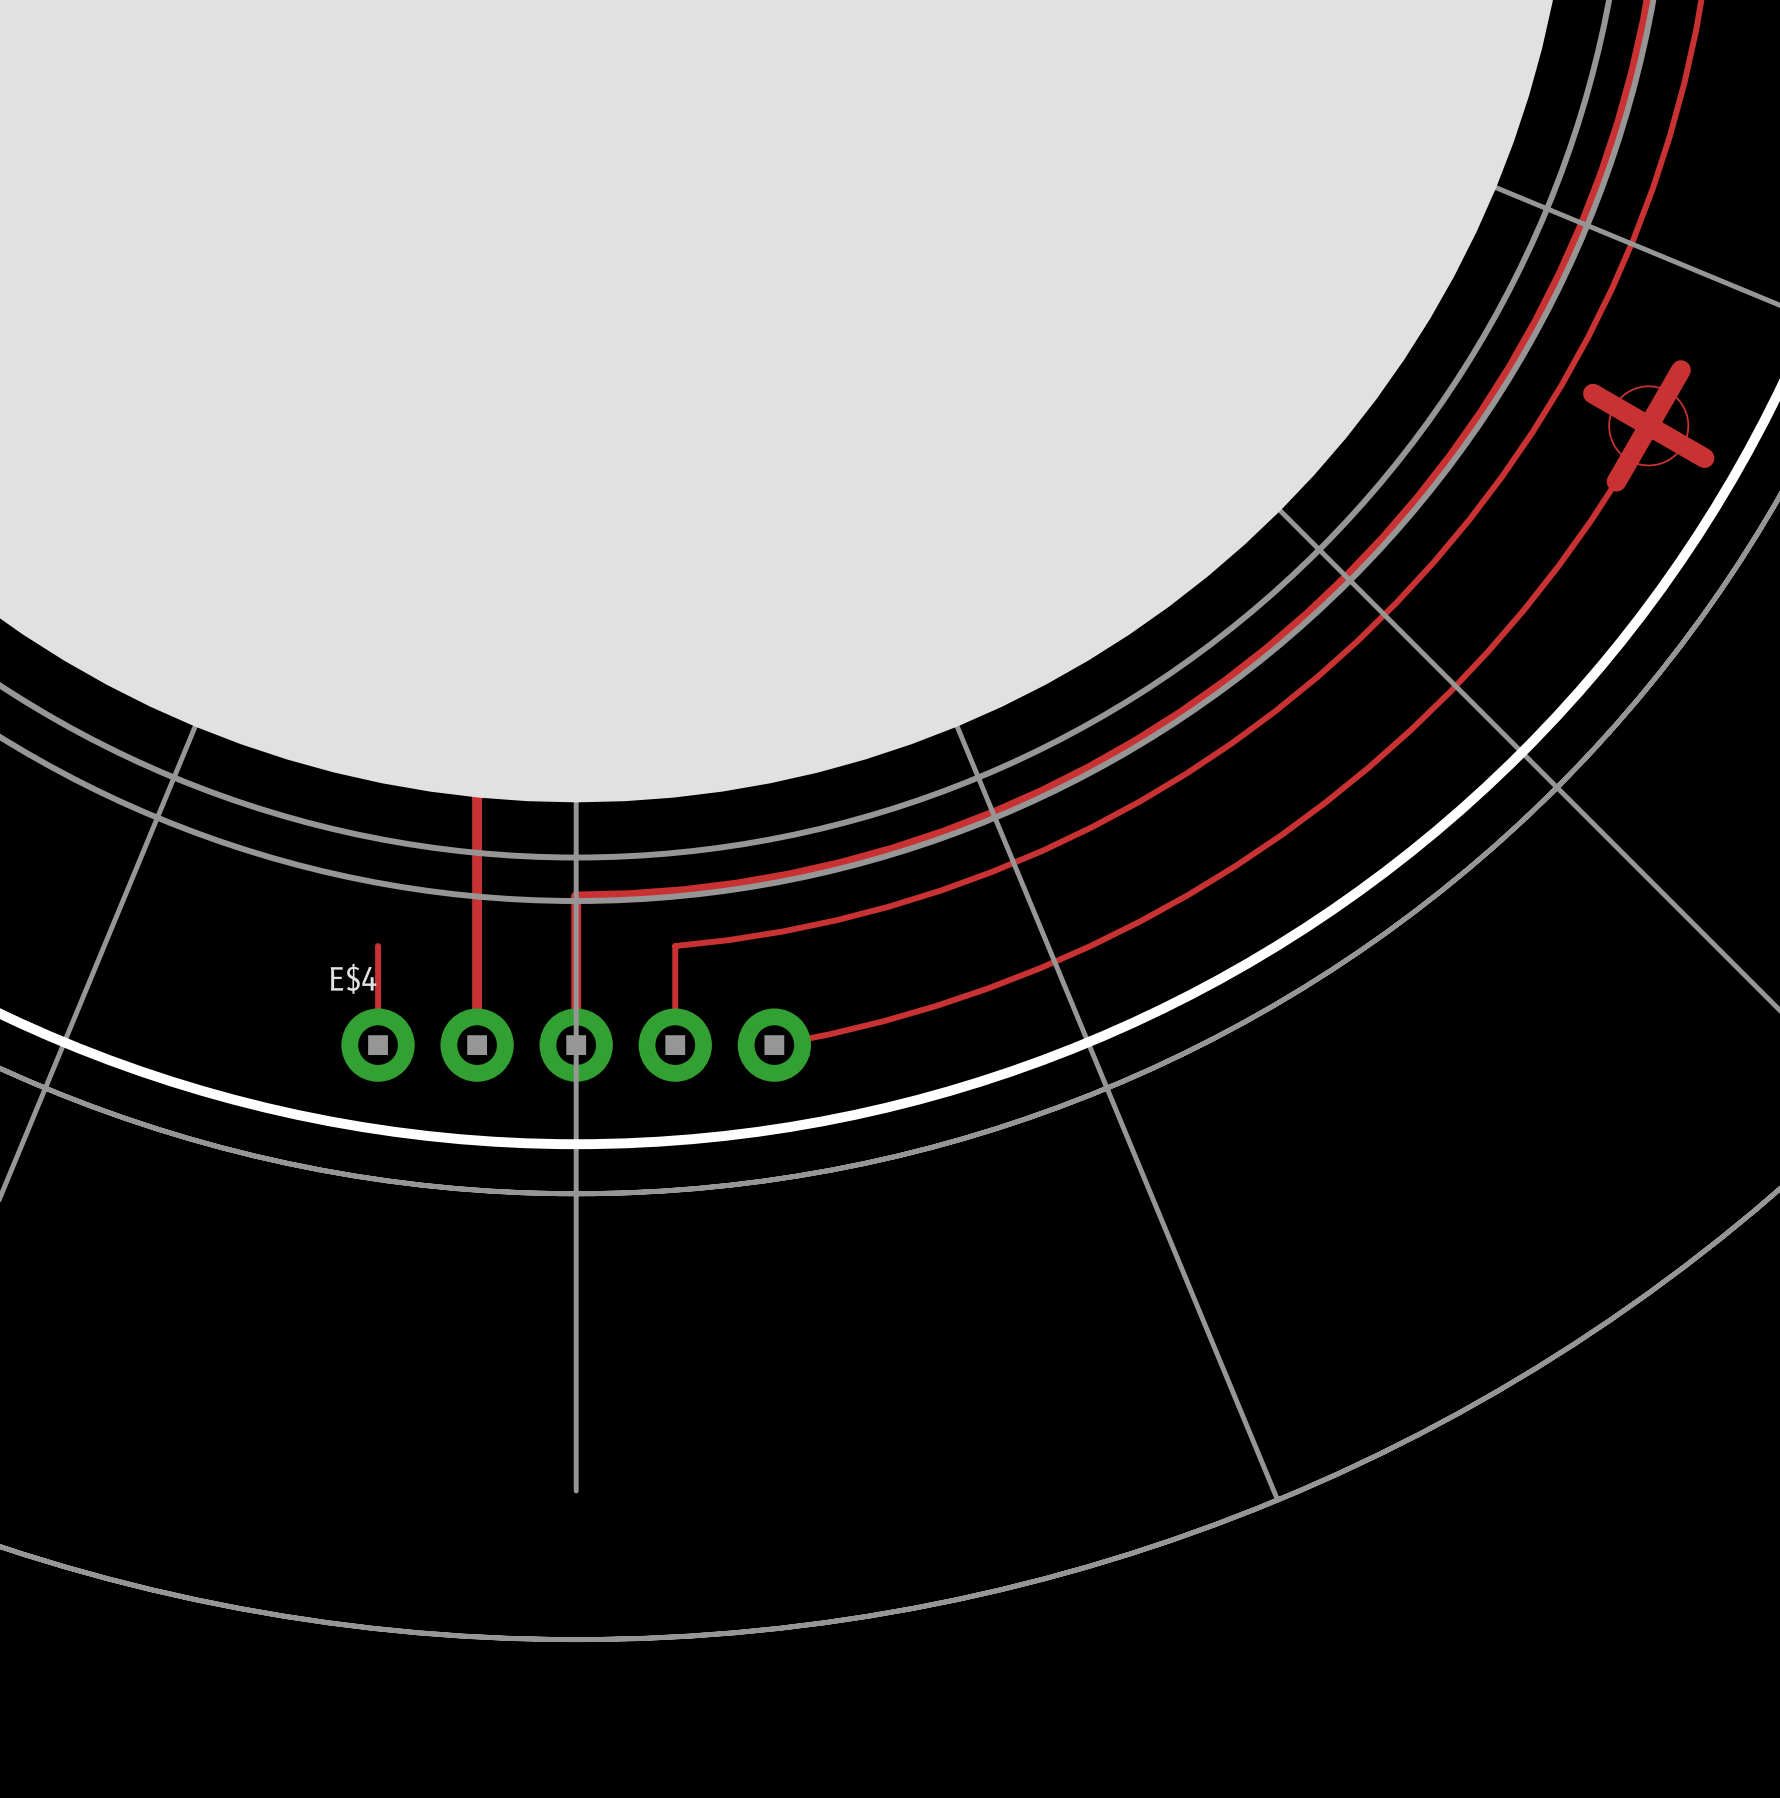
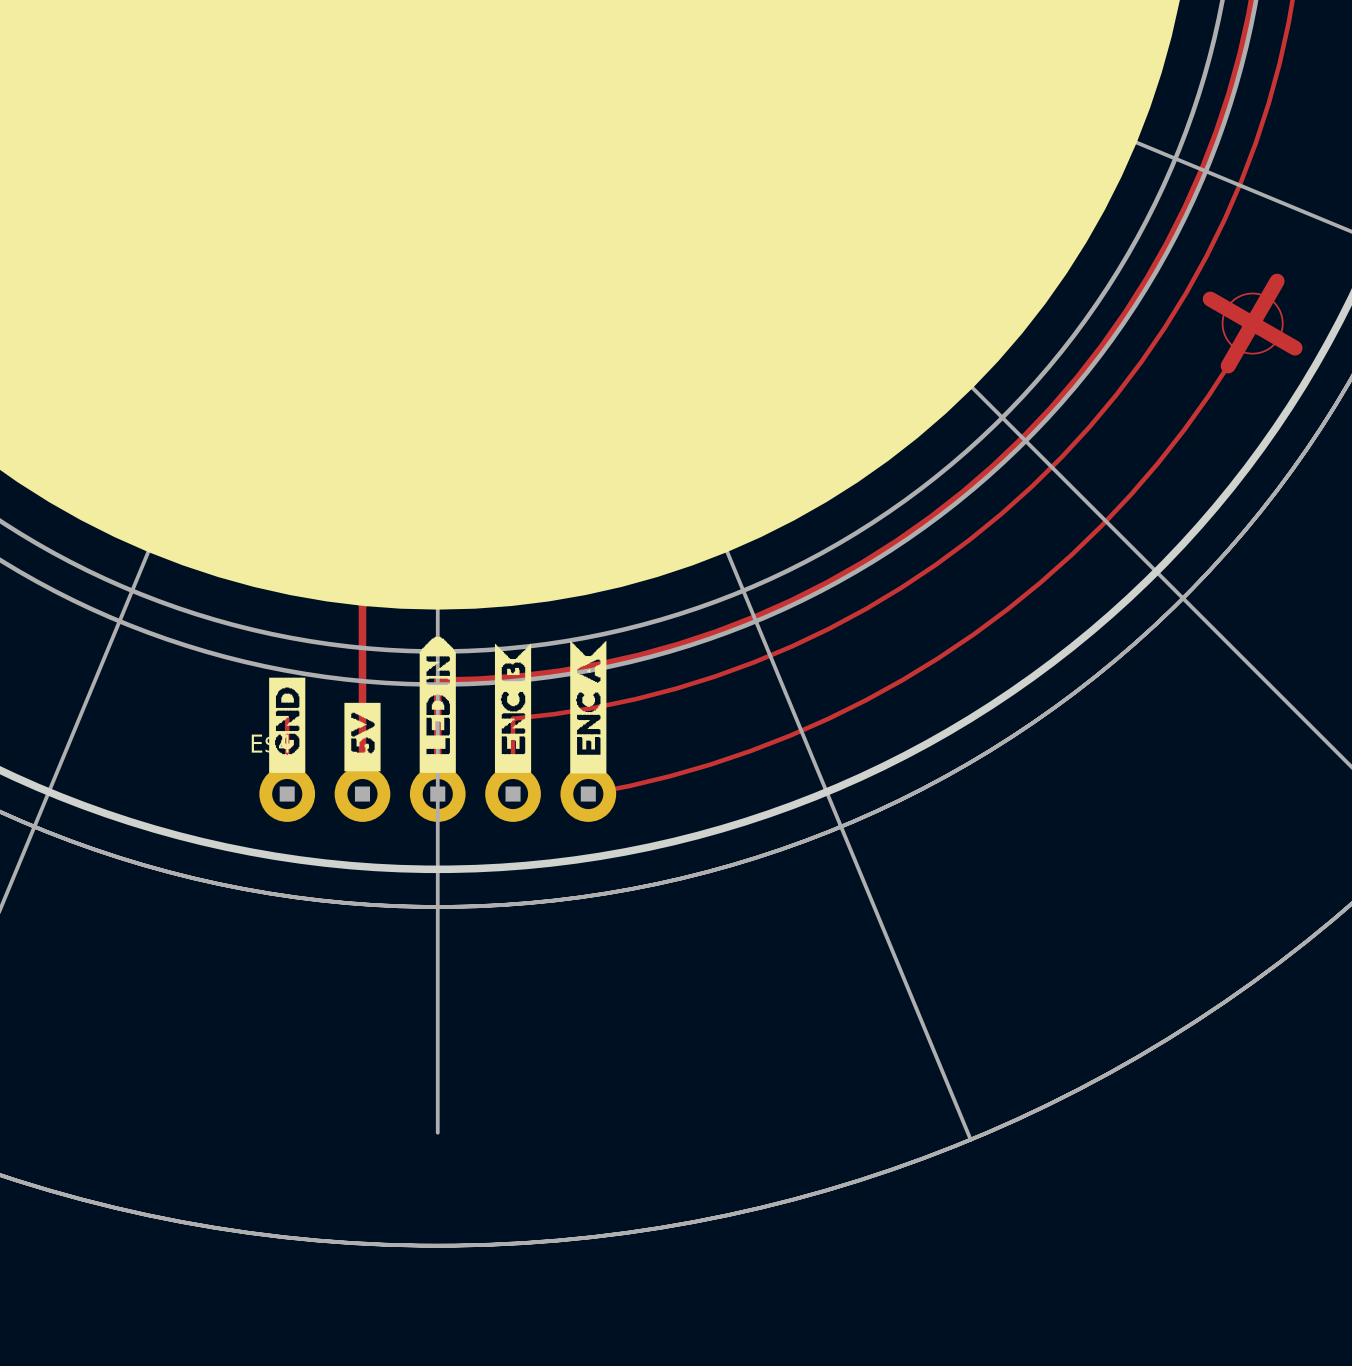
drawing: none -> [419, 636, 456, 773]
drawing: none -> [570, 640, 607, 774]
drawing: none -> [494, 643, 532, 773]
drawing: none -> [269, 677, 306, 773]
drawing: none -> [344, 702, 381, 772]

